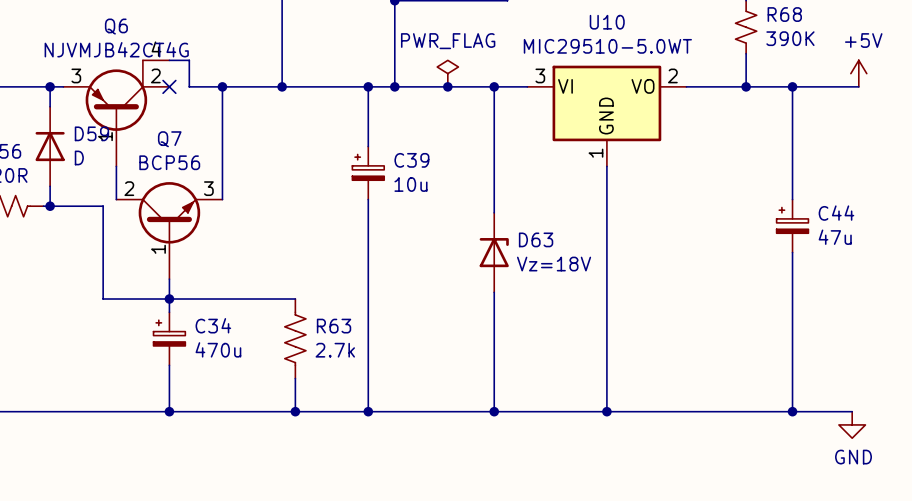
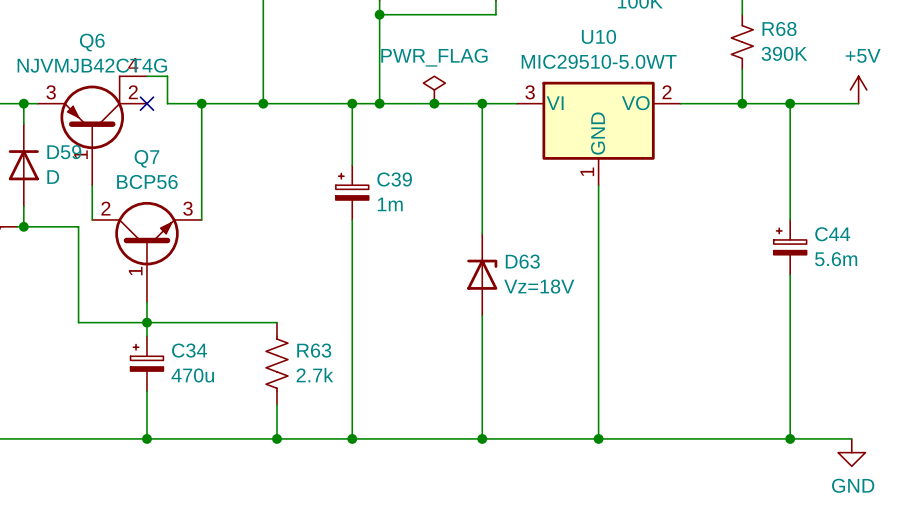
C39 value: 10u (410, 184) -> 1m (390, 204)
C44 value: 47u (835, 237) -> 5.6m (836, 259)

